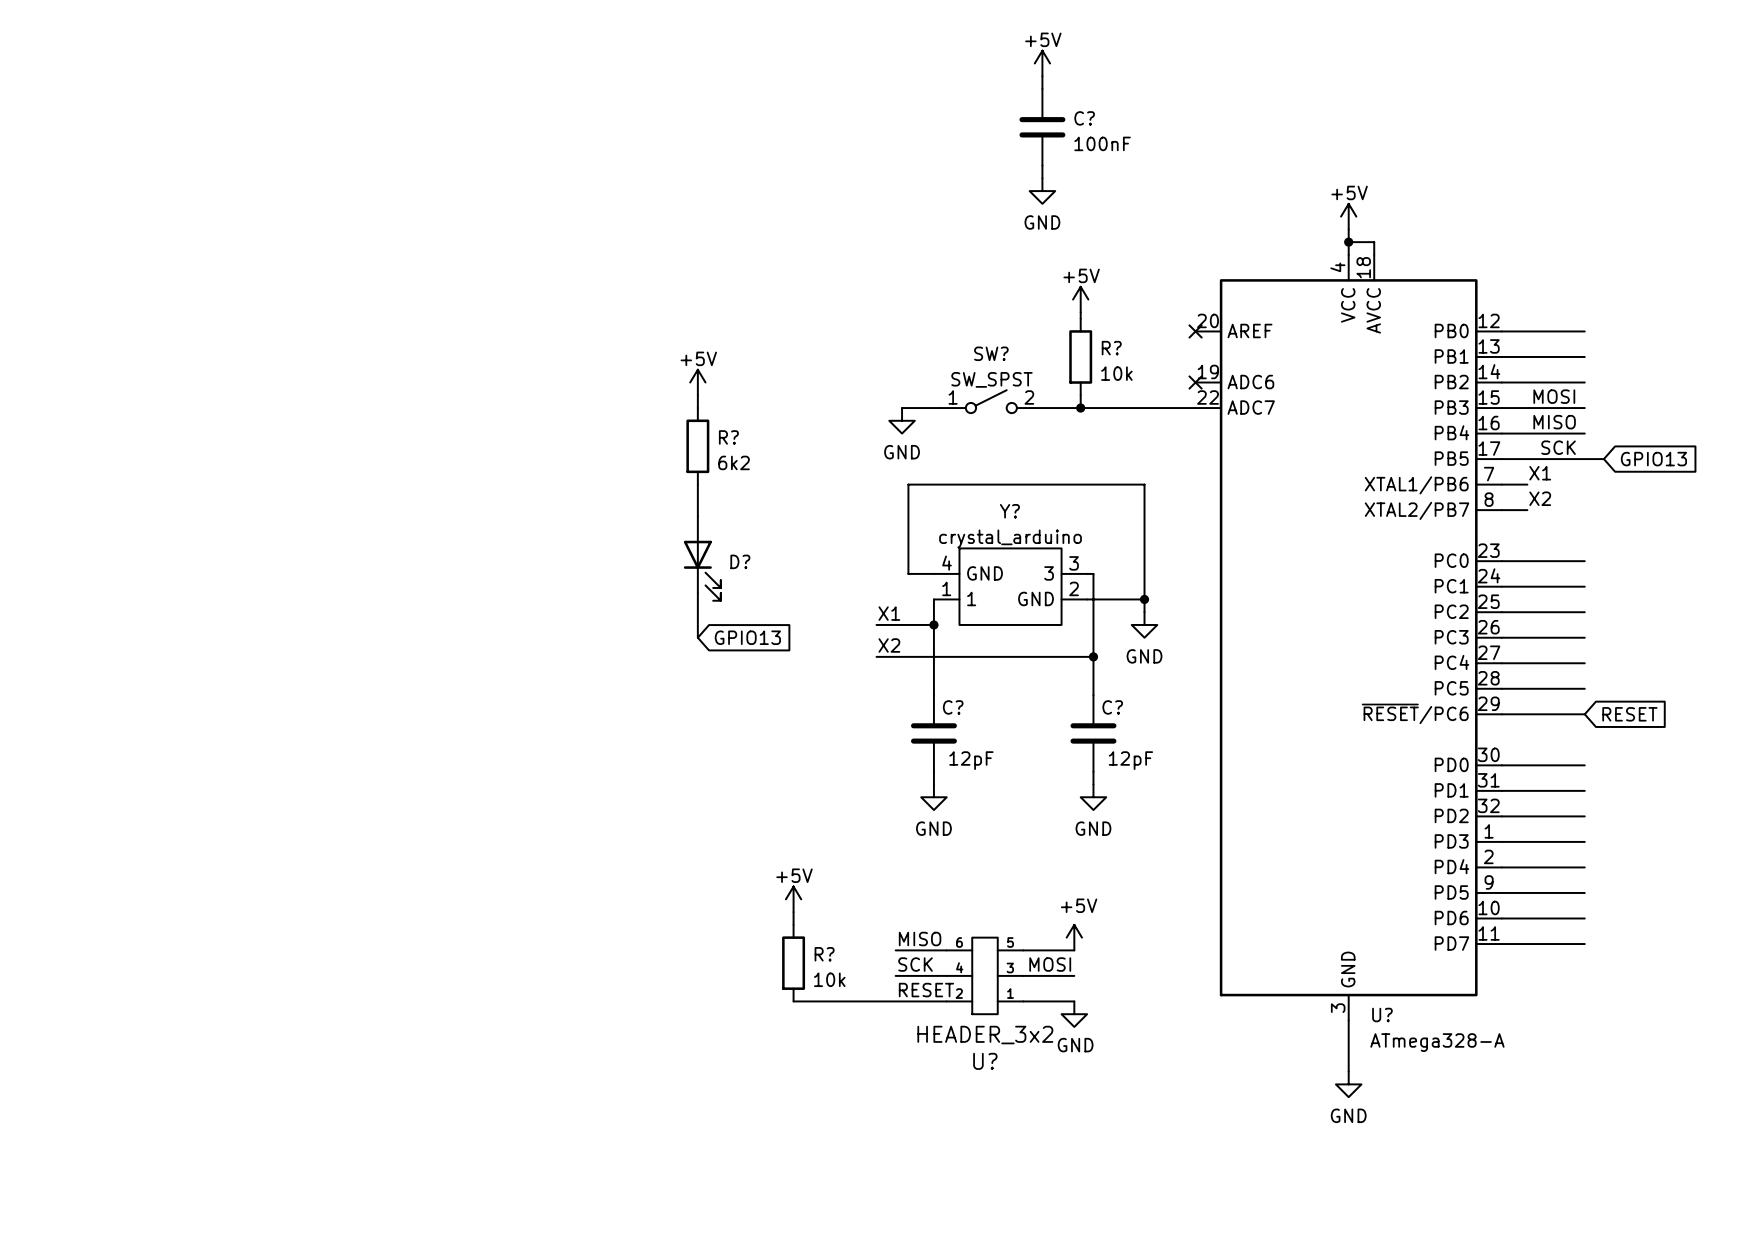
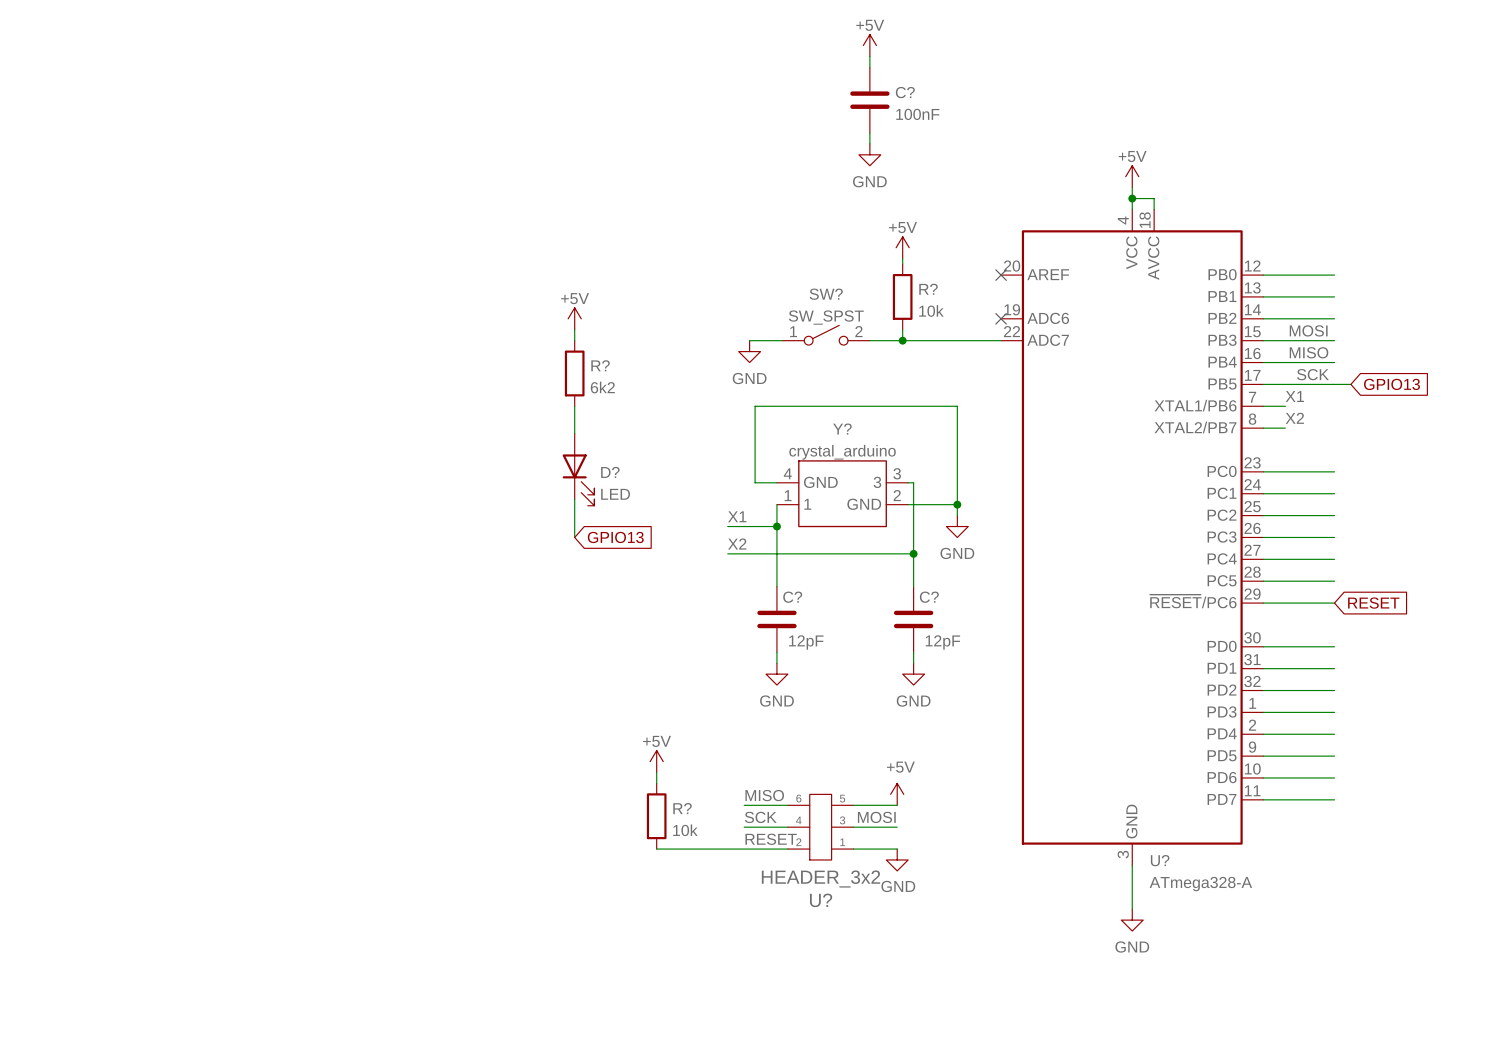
D? value: none -> LED (615, 494)

